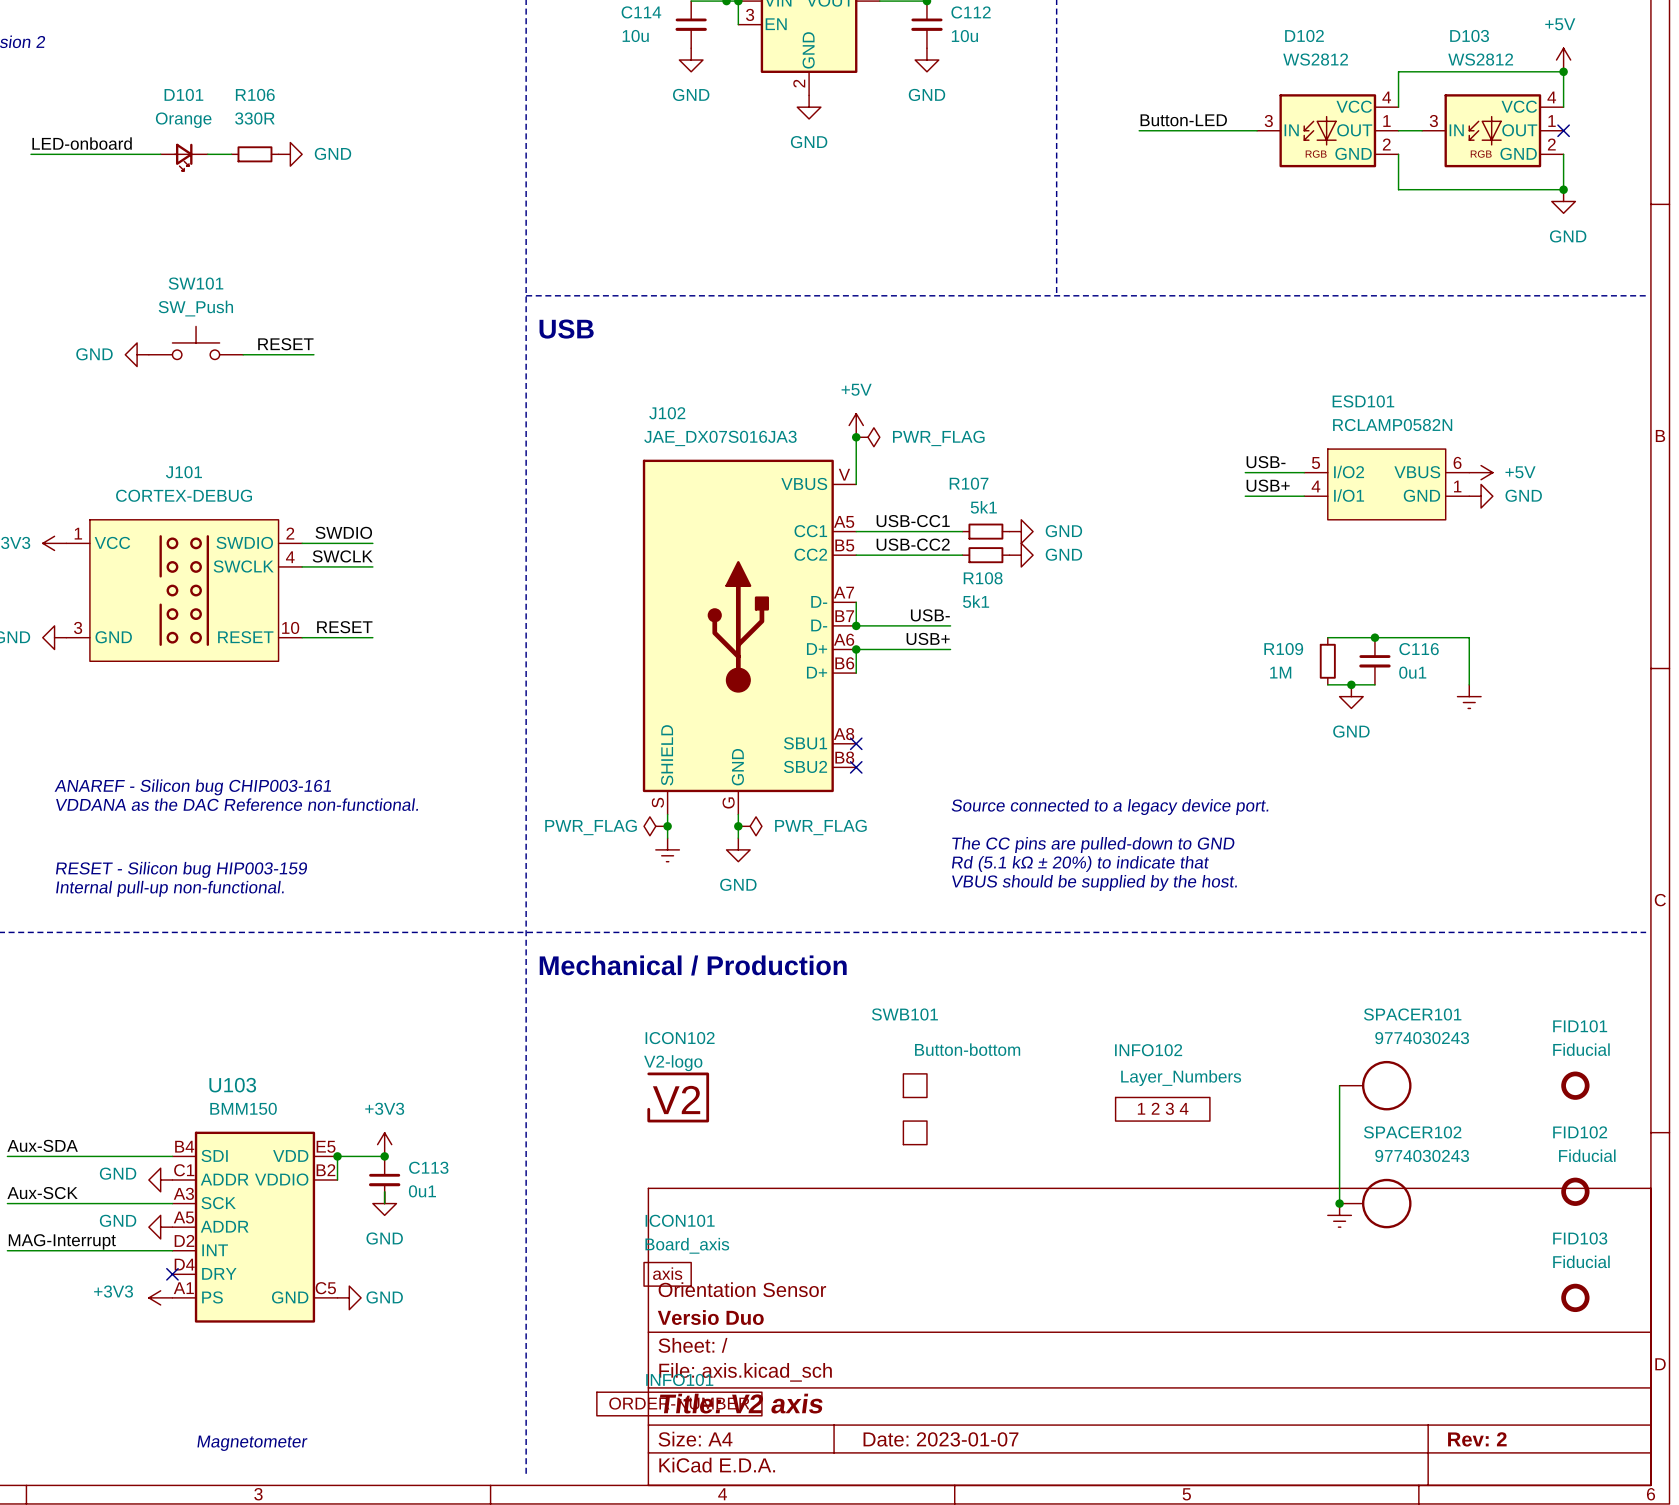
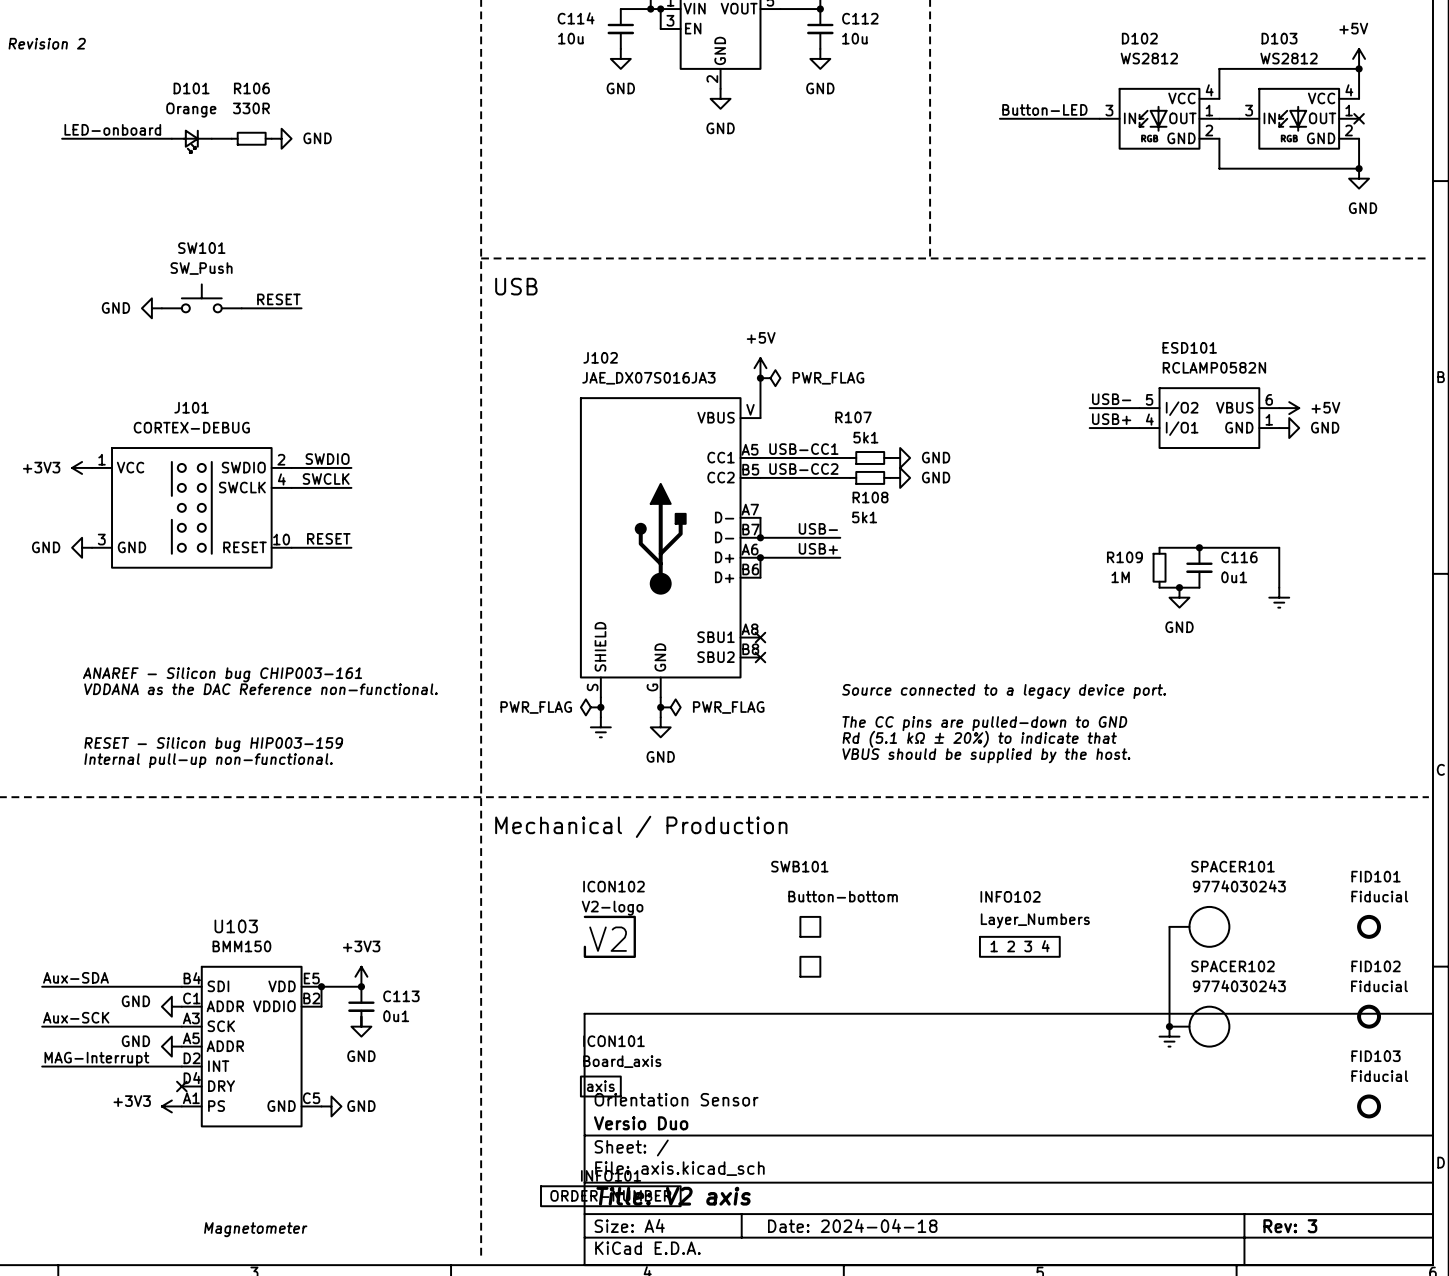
title block: Date: 2023-01-07 (940, 1439) -> Date: 2024-04-18 (852, 1225)
title block: Rev: 2 (1477, 1439) -> Rev: 3 (1290, 1226)

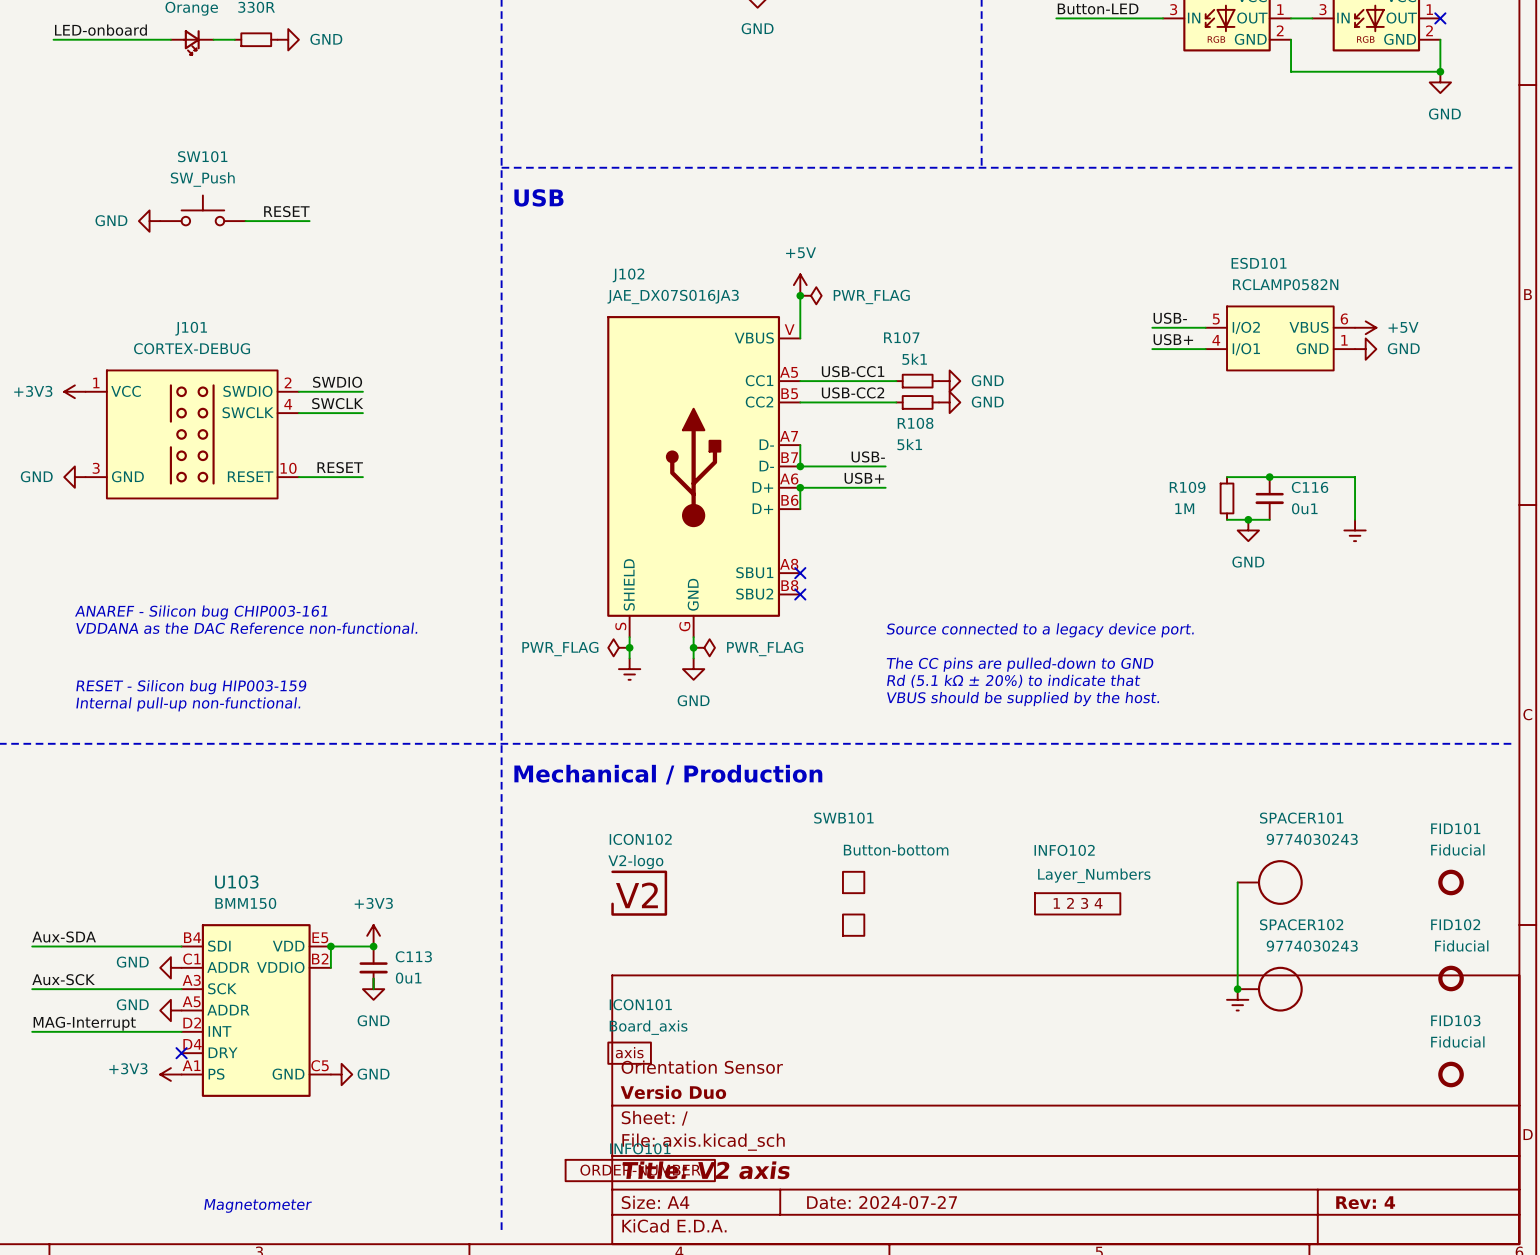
title block: Date: 2024-04-18 (852, 1225) -> Date: 2024-07-27 (882, 1202)
title block: Rev: 3 (1290, 1226) -> Rev: 4 (1365, 1202)

